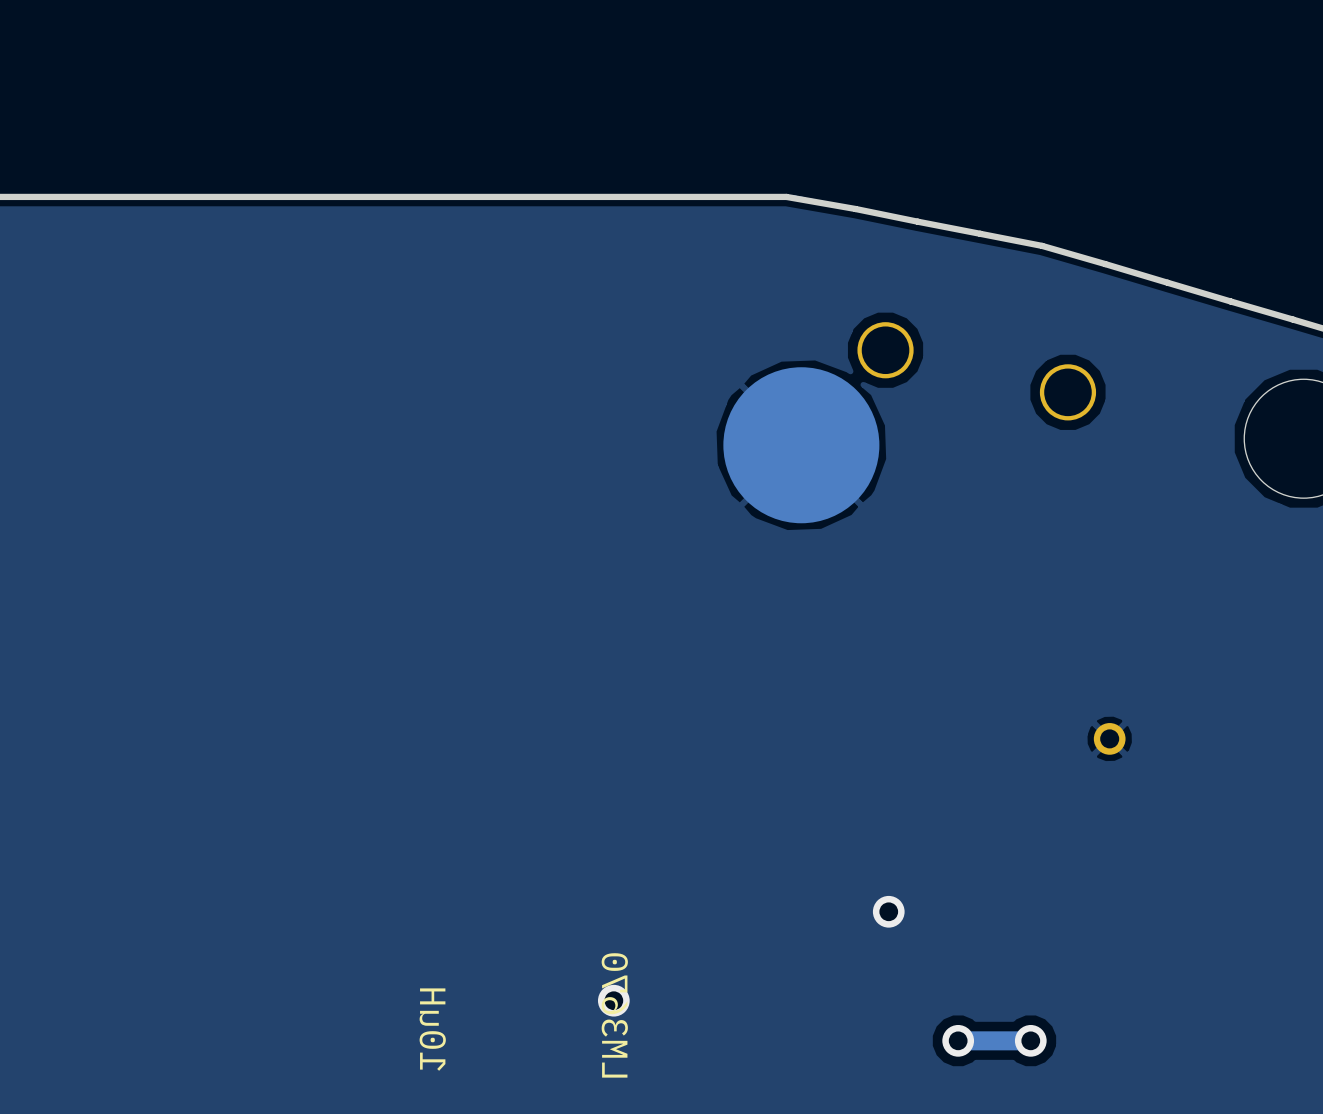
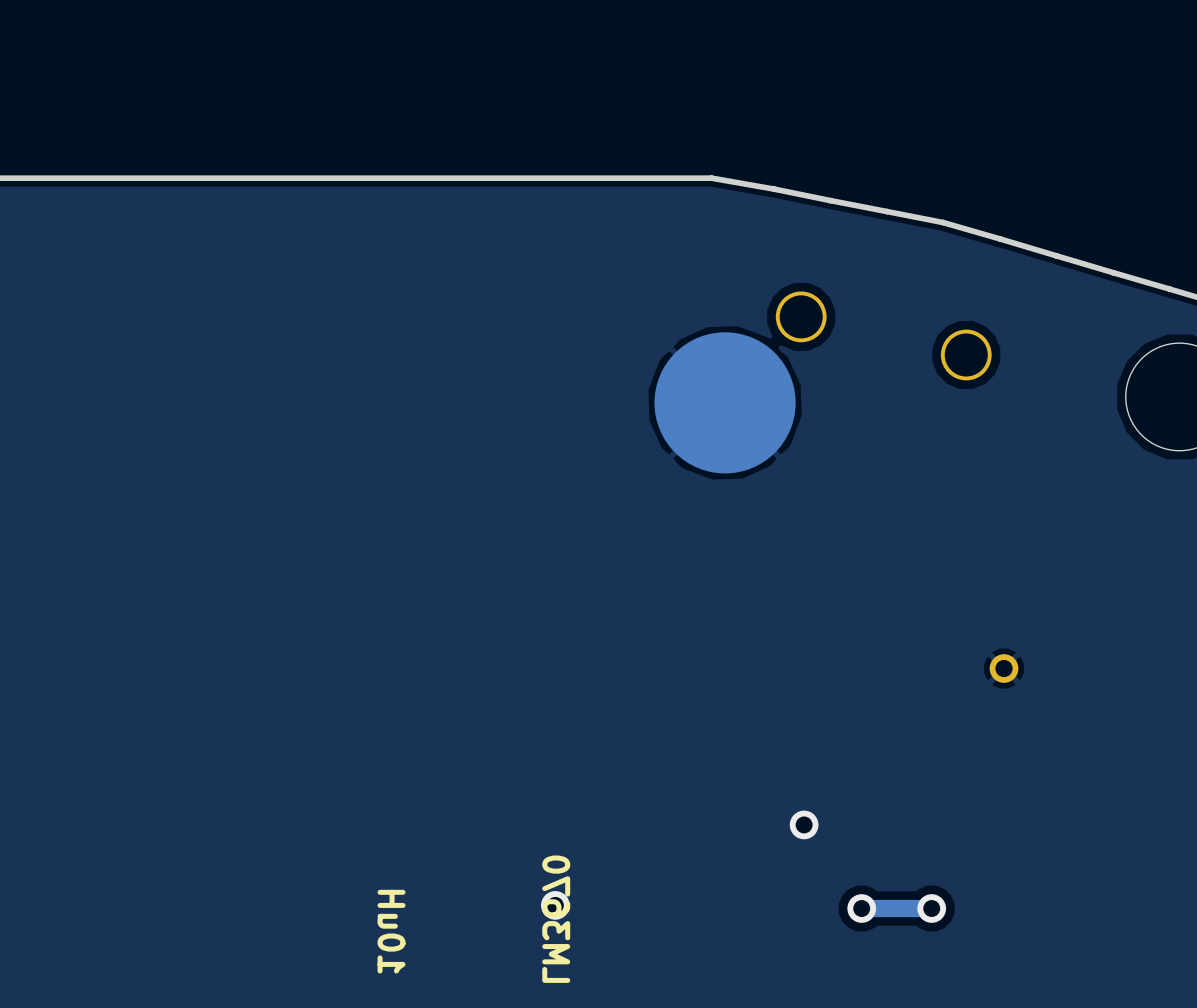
track: none -> (932, 908) (861, 908)
via position: (958, 1040) -> (861, 908)
track: (1030, 1040) (958, 1040) -> none
via position: (1030, 1040) -> (931, 908)

